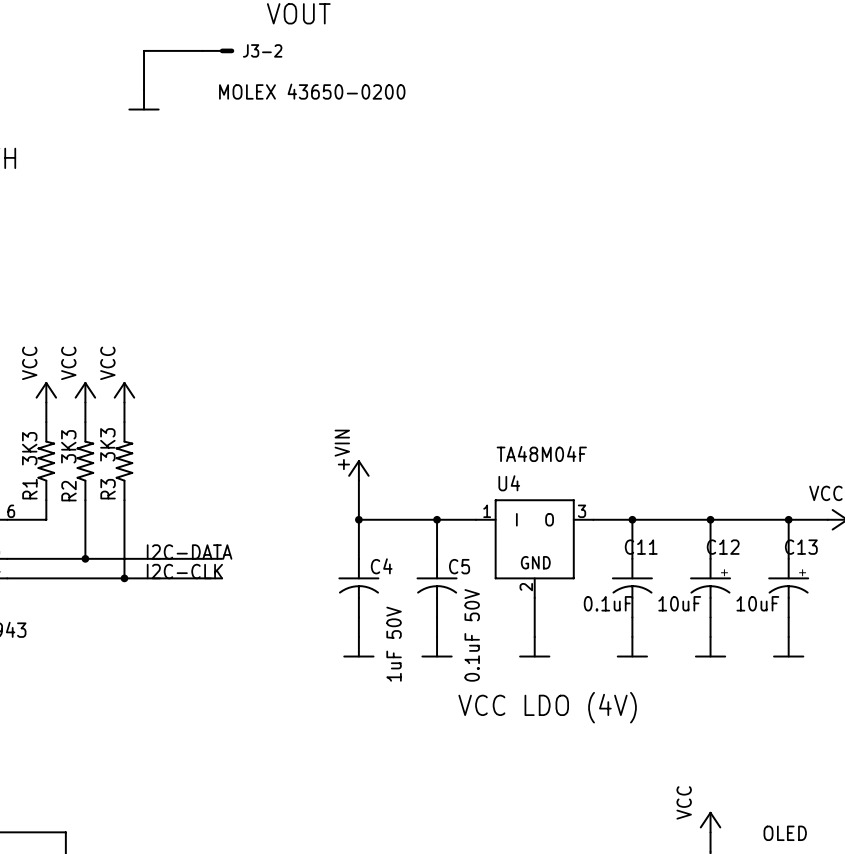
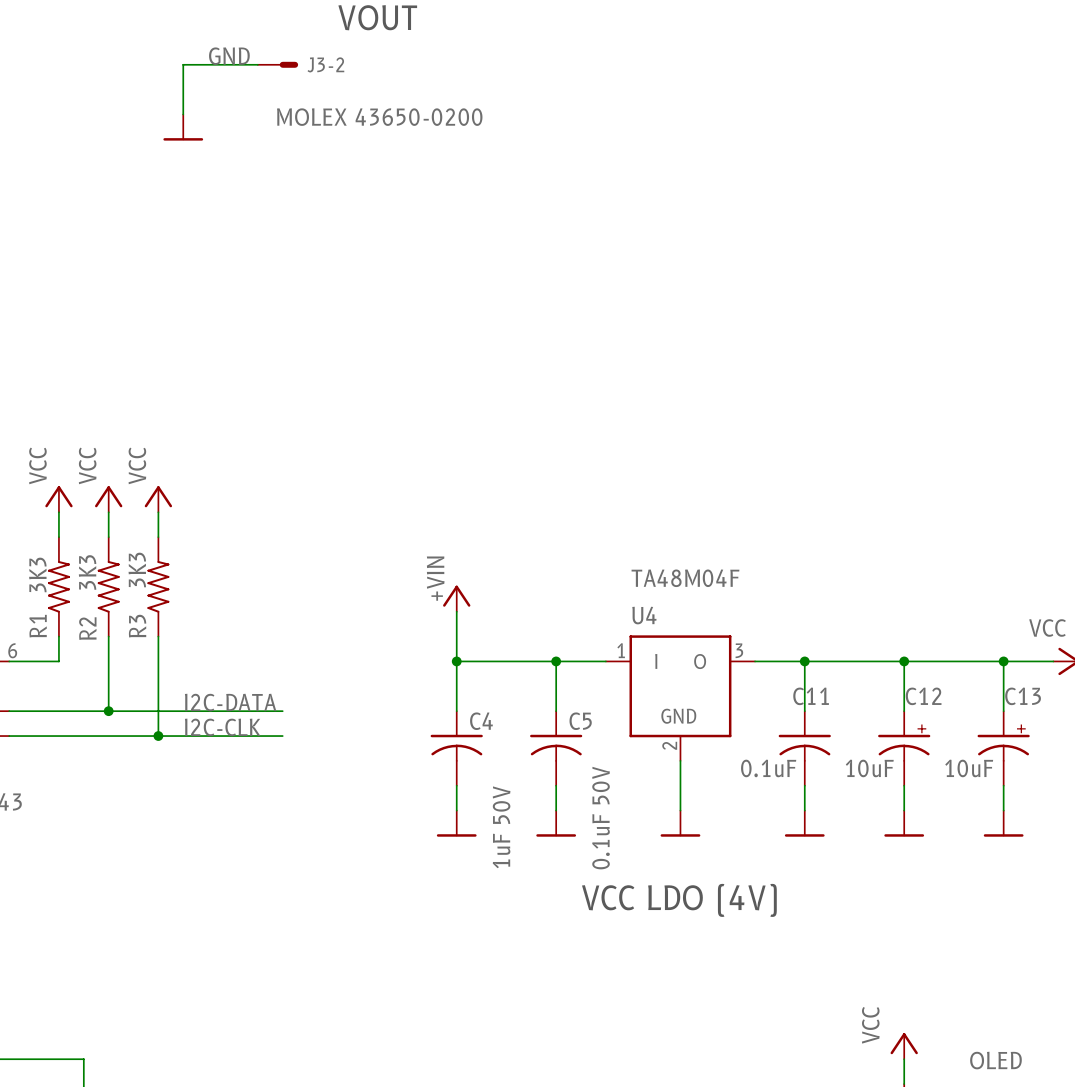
label: none -> GND (229, 56)

